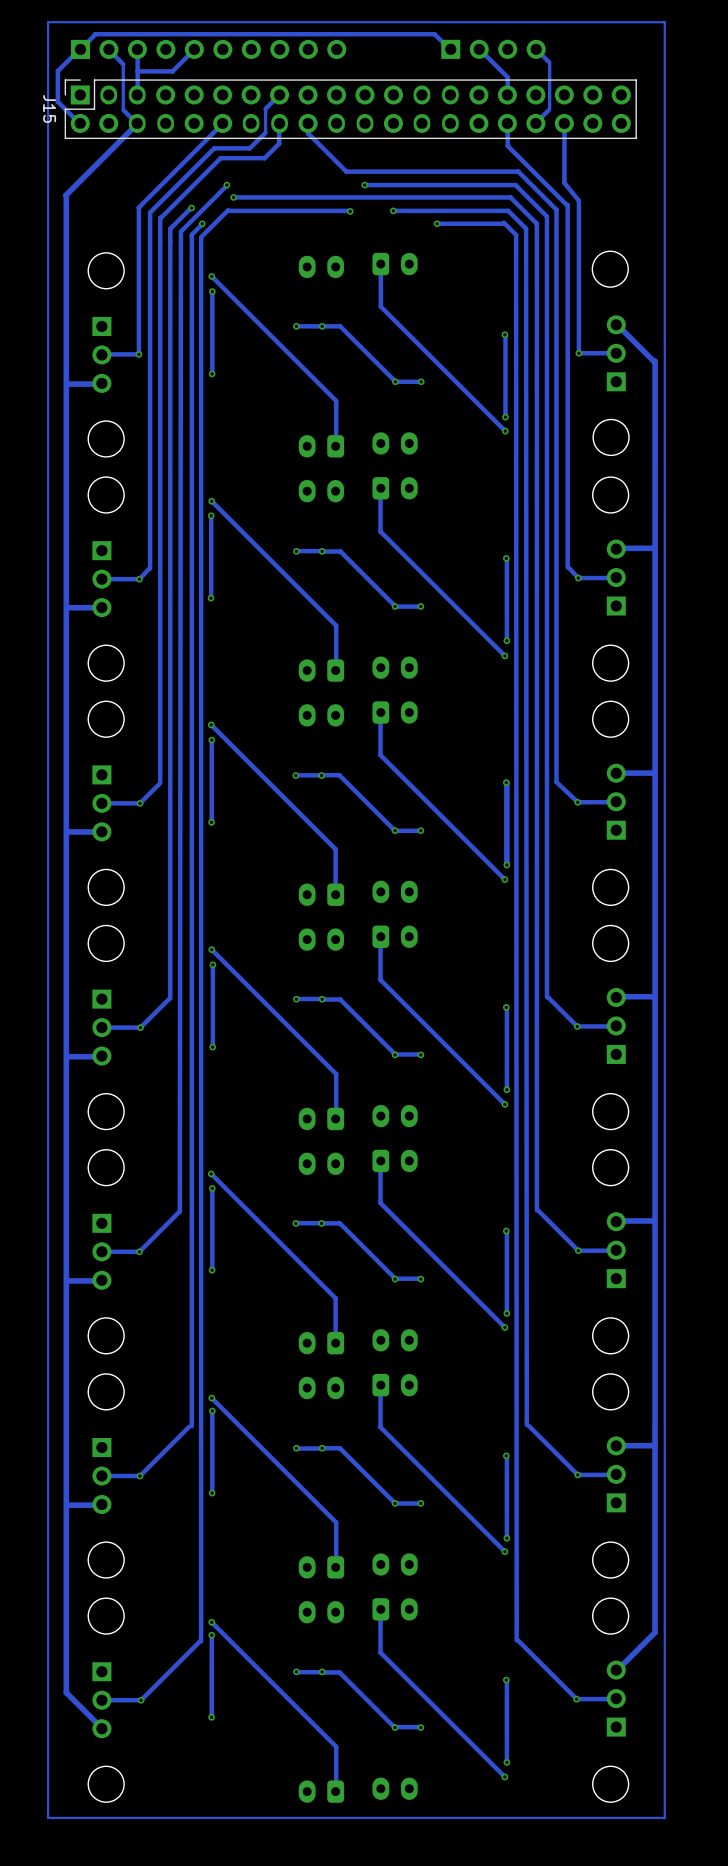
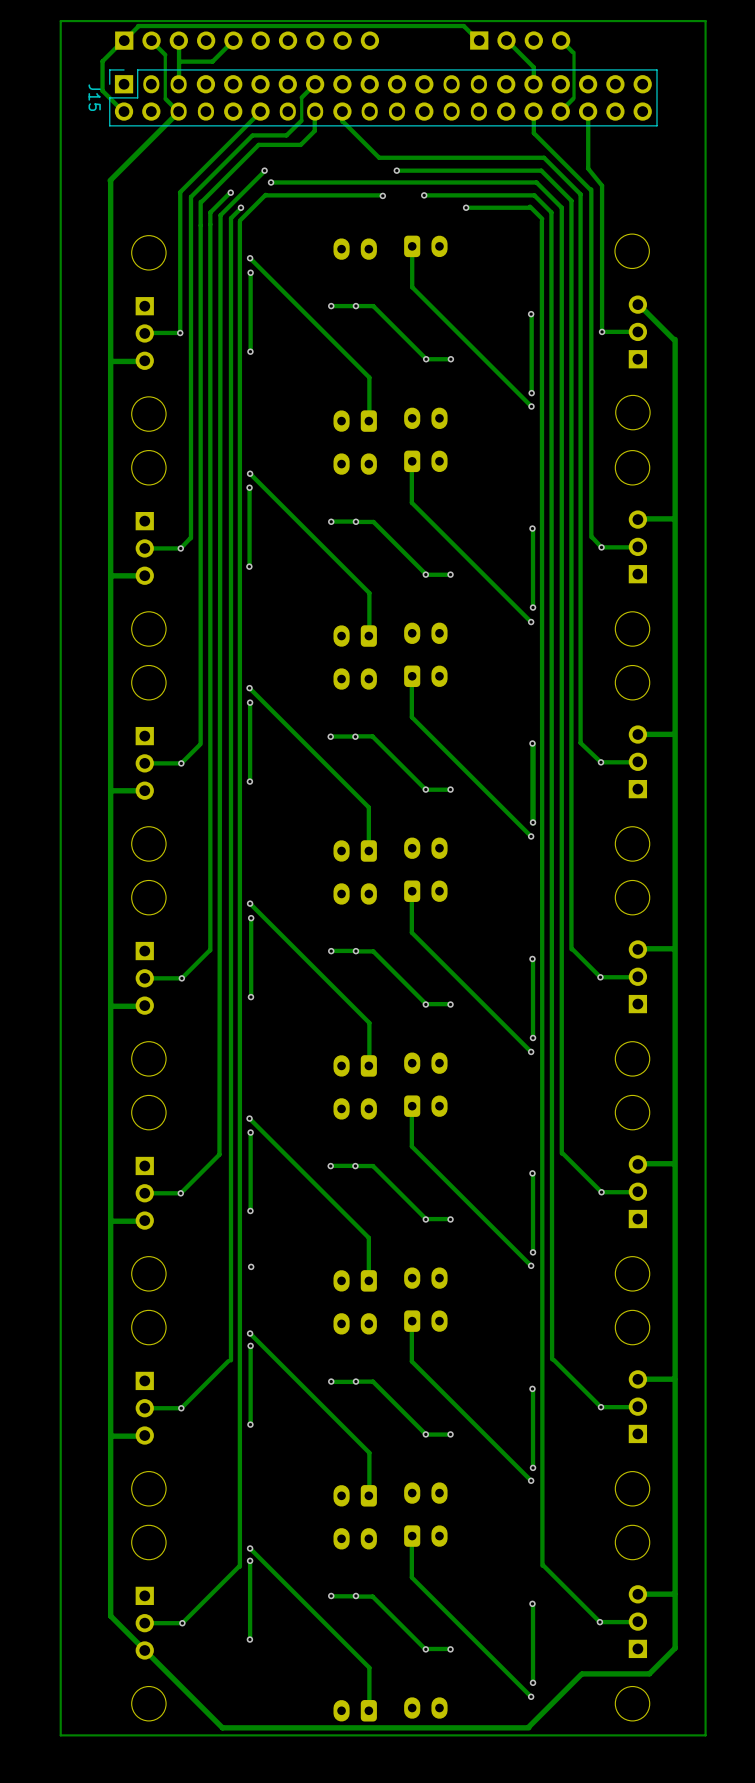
track: (664, 22) (48, 22) (48, 1817) (664, 1817) (664, 22) -> (705, 21) (705, 1735) (60, 1735) (60, 21) (705, 21)
track: (655, 361) (655, 1632) (618, 1669) -> (675, 339) (675, 1648) (649, 1673)
via: none -> (251, 1266)
track: none -> (674, 1594) (637, 1594)
track: (66, 1692) (102, 1729) -> (110, 1616) (222, 1727) (528, 1727)
track: none -> (581, 1674) (528, 1726)
track: none -> (649, 1673) (582, 1673)

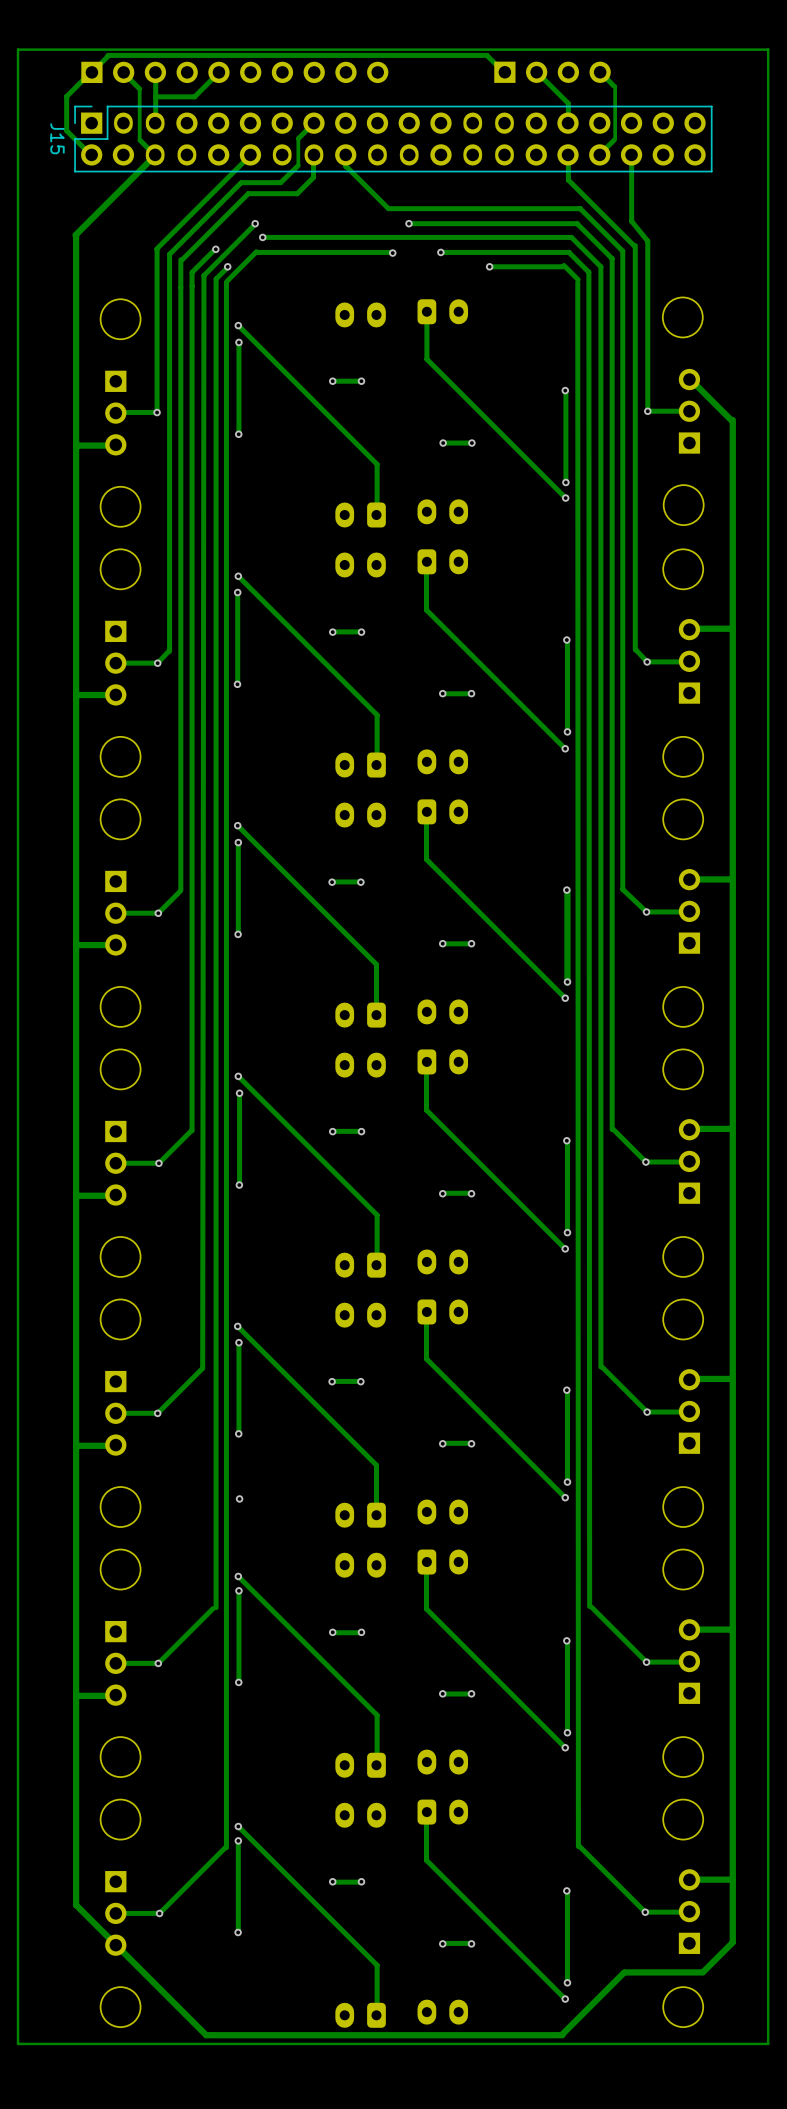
track: (355, 306) (373, 306) (426, 359) -> none
track: (356, 521) (373, 521) (426, 574) -> none
track: (355, 736) (372, 736) (425, 789) -> none
track: (356, 951) (373, 951) (426, 1004) -> none
track: (355, 1166) (372, 1166) (425, 1219) -> none
track: (355, 1381) (372, 1381) (425, 1434) -> none
track: (355, 1596) (372, 1596) (425, 1649) -> none

